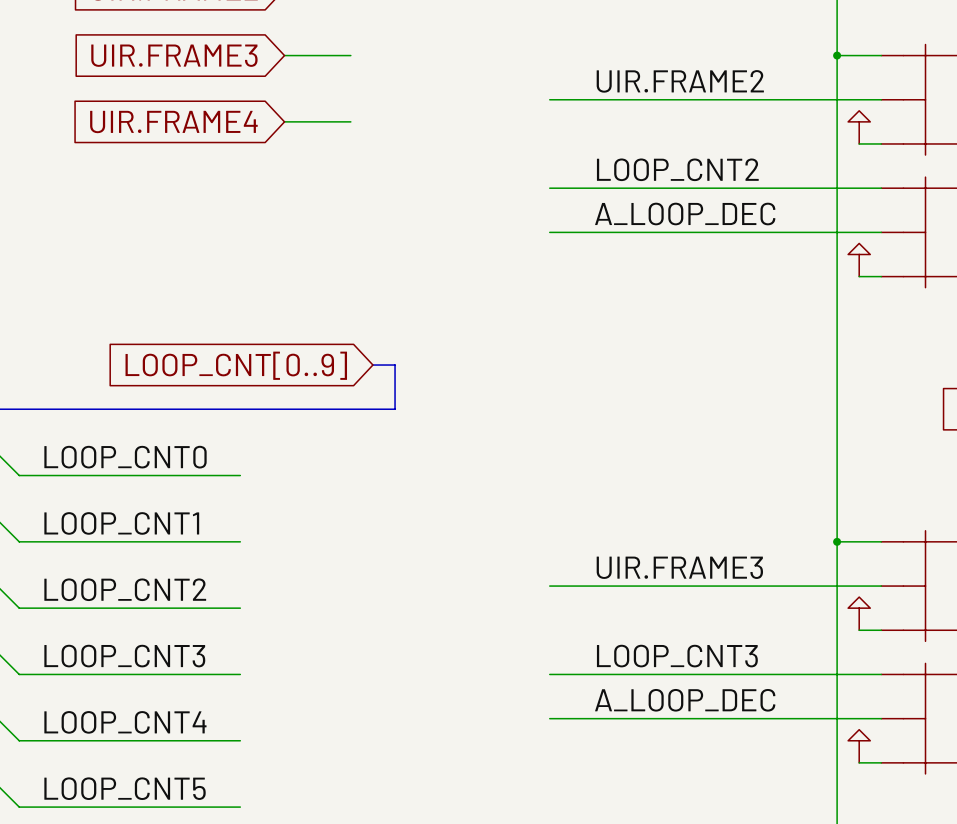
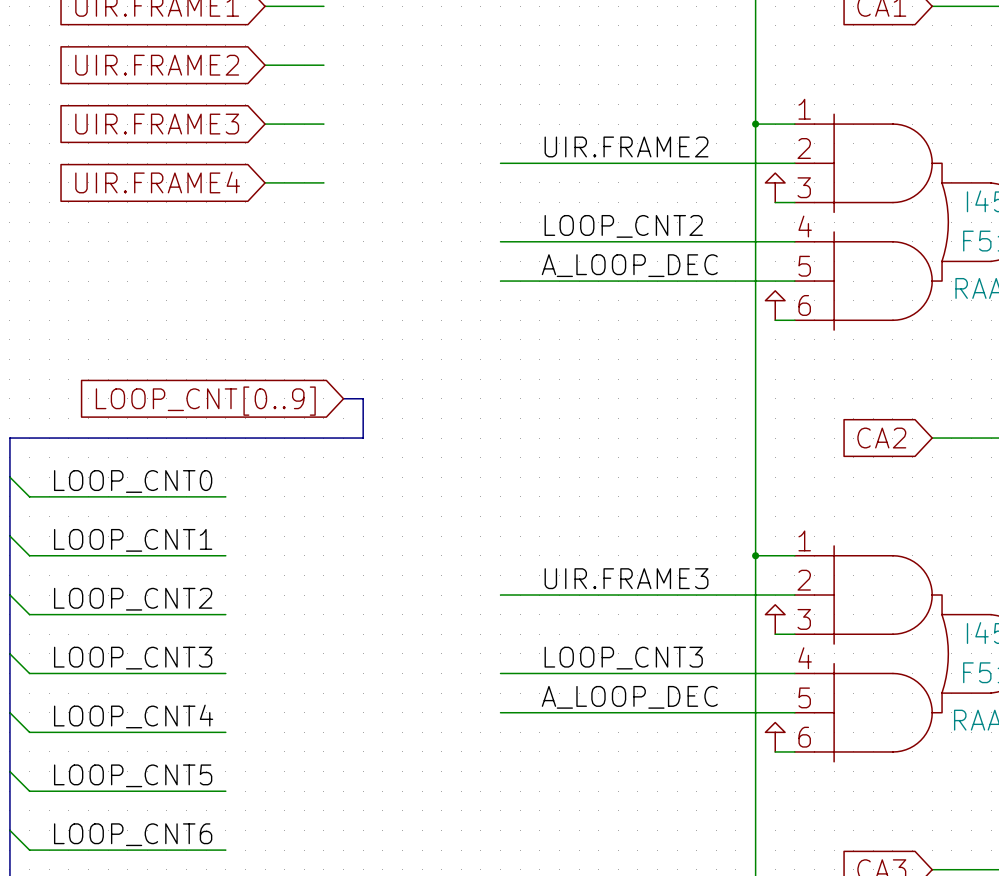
part pin number: none -> 1 (804, 109)
part pin number: none -> 2 (804, 148)
part pin number: none -> 3 (804, 187)
part pin number: none -> 4 (805, 226)
part pin number: none -> 5 (804, 266)
part pin number: none -> 6 (804, 305)
part pin number: none -> 1 (804, 540)
part pin number: none -> 2 (804, 580)
part pin number: none -> 3 (804, 619)
part pin number: none -> 4 (805, 658)
part pin number: none -> 5 (804, 697)
part pin number: none -> 6 (804, 737)

